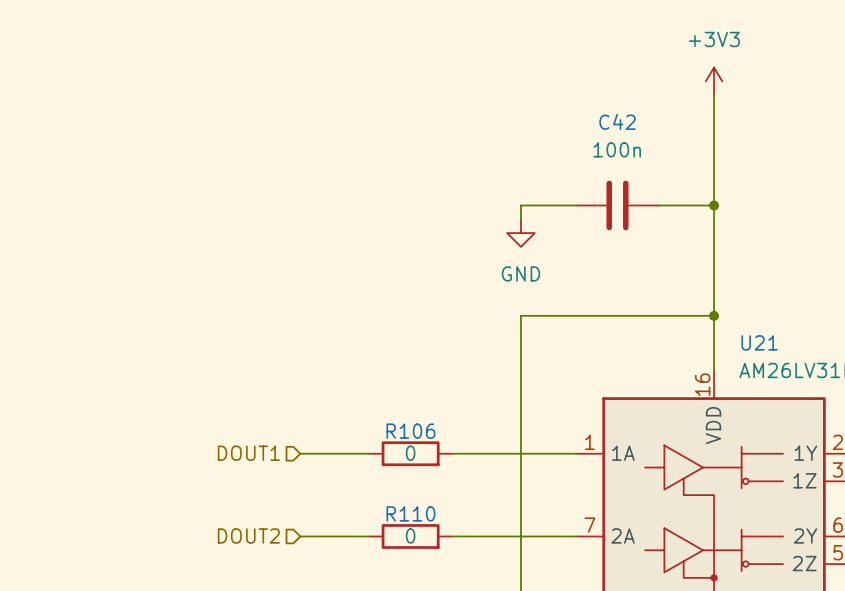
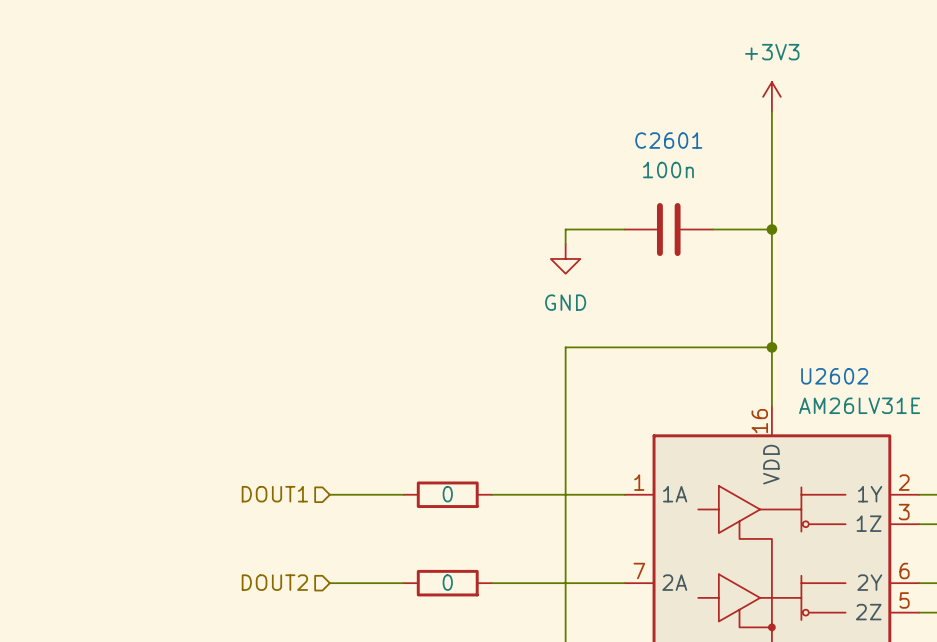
C42 name: C42 (617, 121) -> C2601 (668, 140)
U21 name: U21 (759, 342) -> U2602 (834, 376)
R106 name: R106 (410, 431) -> none
R110 name: R110 (410, 513) -> none

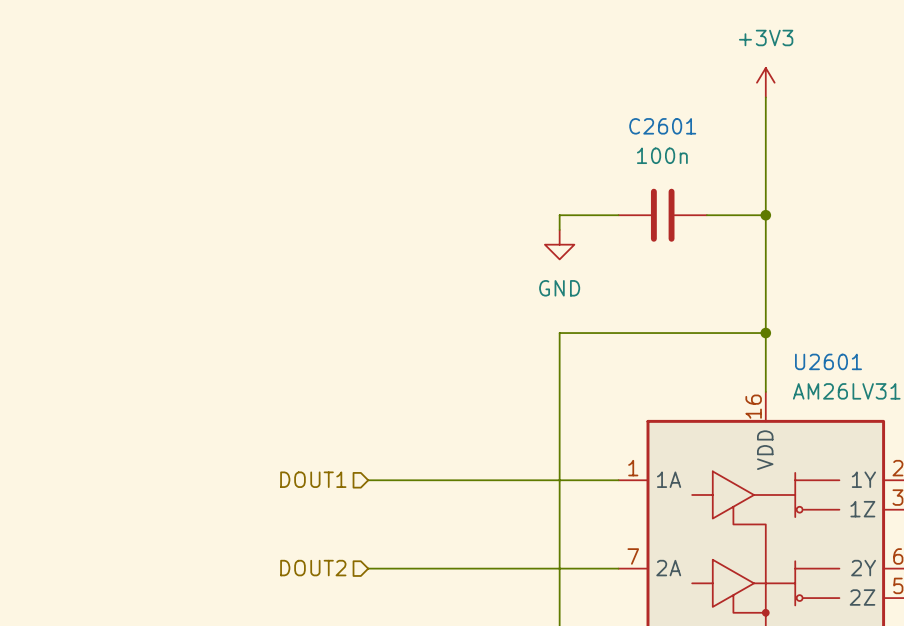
U2602 name: U2602 (834, 376) -> U2601 (828, 361)
hierarchical label position: DOUT1 (274, 494) -> DOUT1 (313, 479)
wire: (329, 494) (374, 494) -> none
wire: none -> (397, 480) (486, 480)
part: 0 (447, 494) -> none
hierarchical label position: DOUT2 (274, 582) -> DOUT2 (313, 568)
wire: (329, 583) (374, 583) -> none
wire: none -> (397, 568) (486, 568)
part: 0 (447, 583) -> none

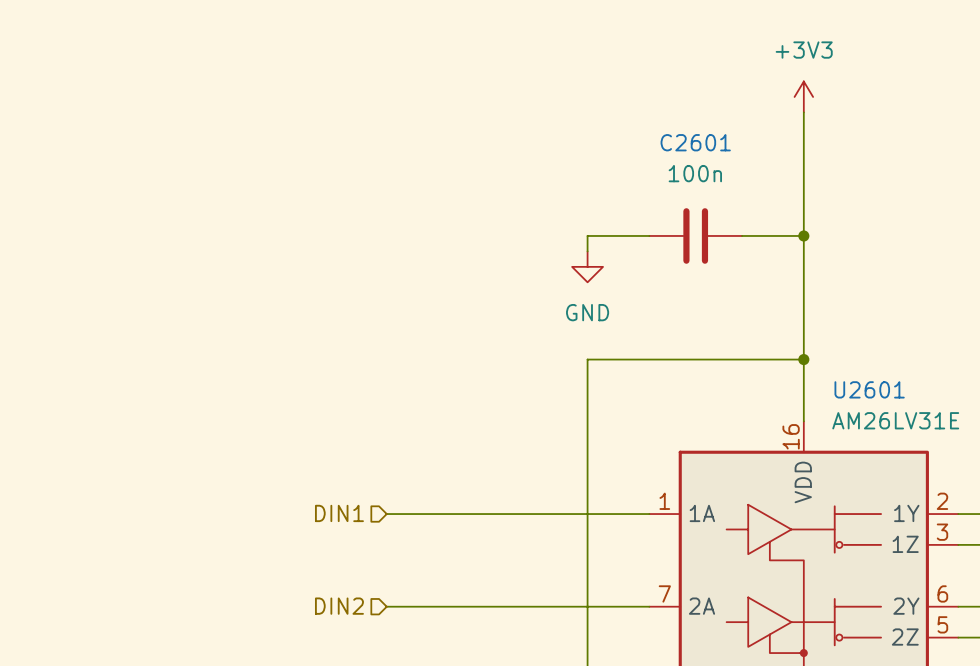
hierarchical label: DOUT1 (313, 479) -> DIN1 (339, 513)
hierarchical label: DOUT2 (313, 568) -> DIN2 (339, 606)

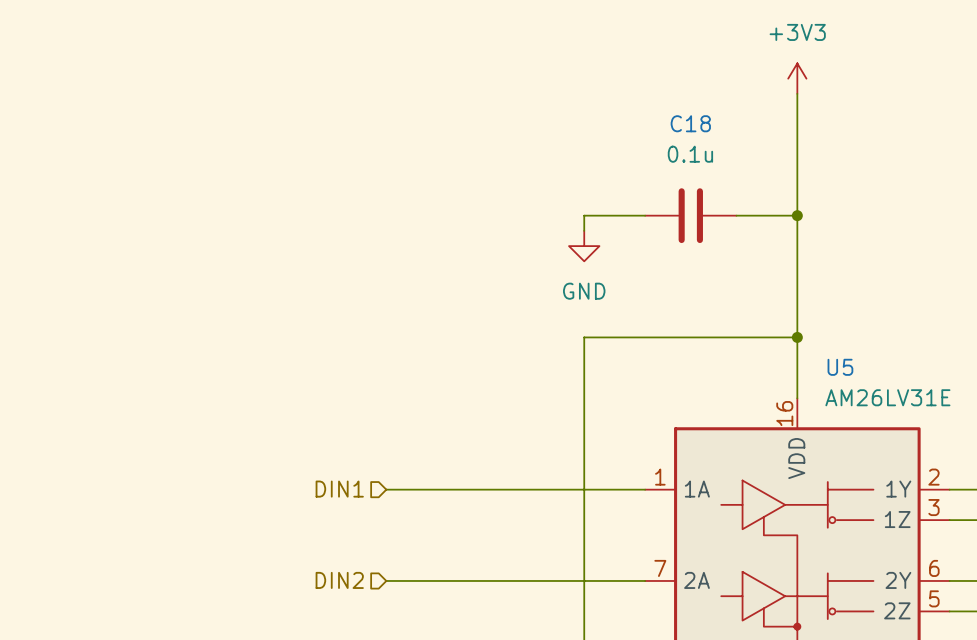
C2601 name: C2601 (695, 142) -> C18 (690, 123)
C2601 value: 100n (695, 173) -> 0.1u (690, 154)
U2601 name: U2601 (869, 389) -> U5 (840, 367)

